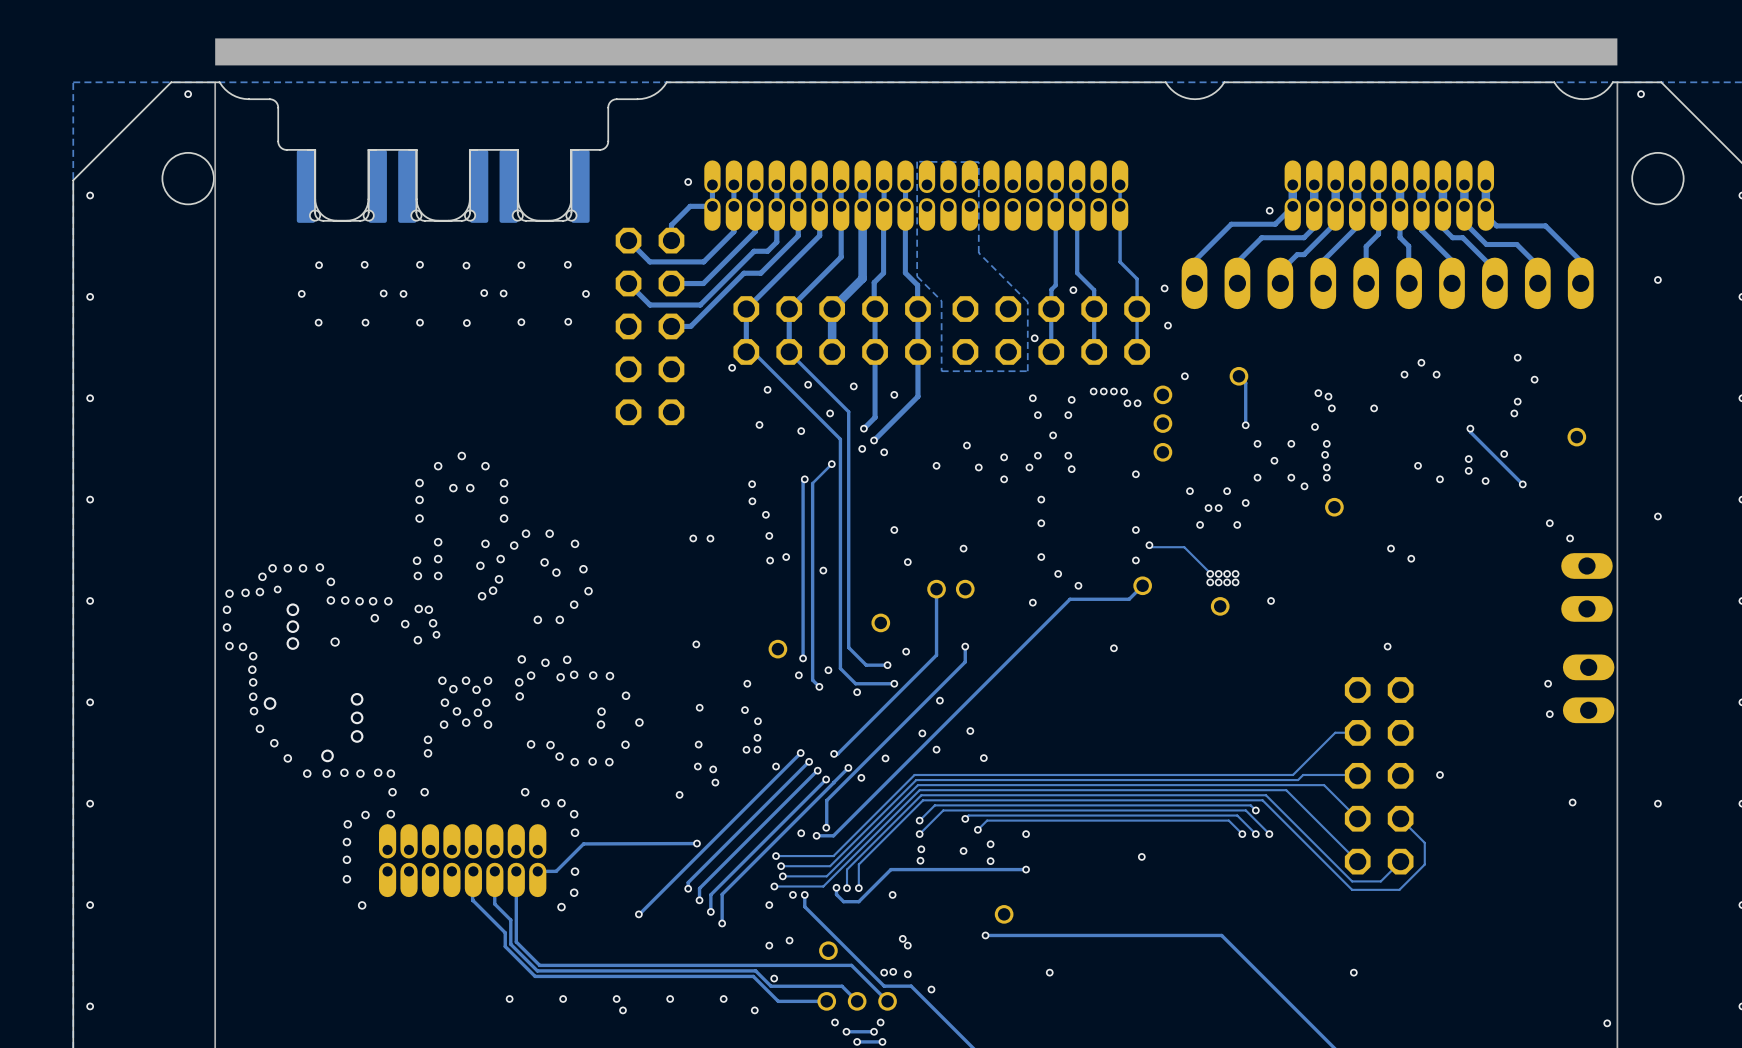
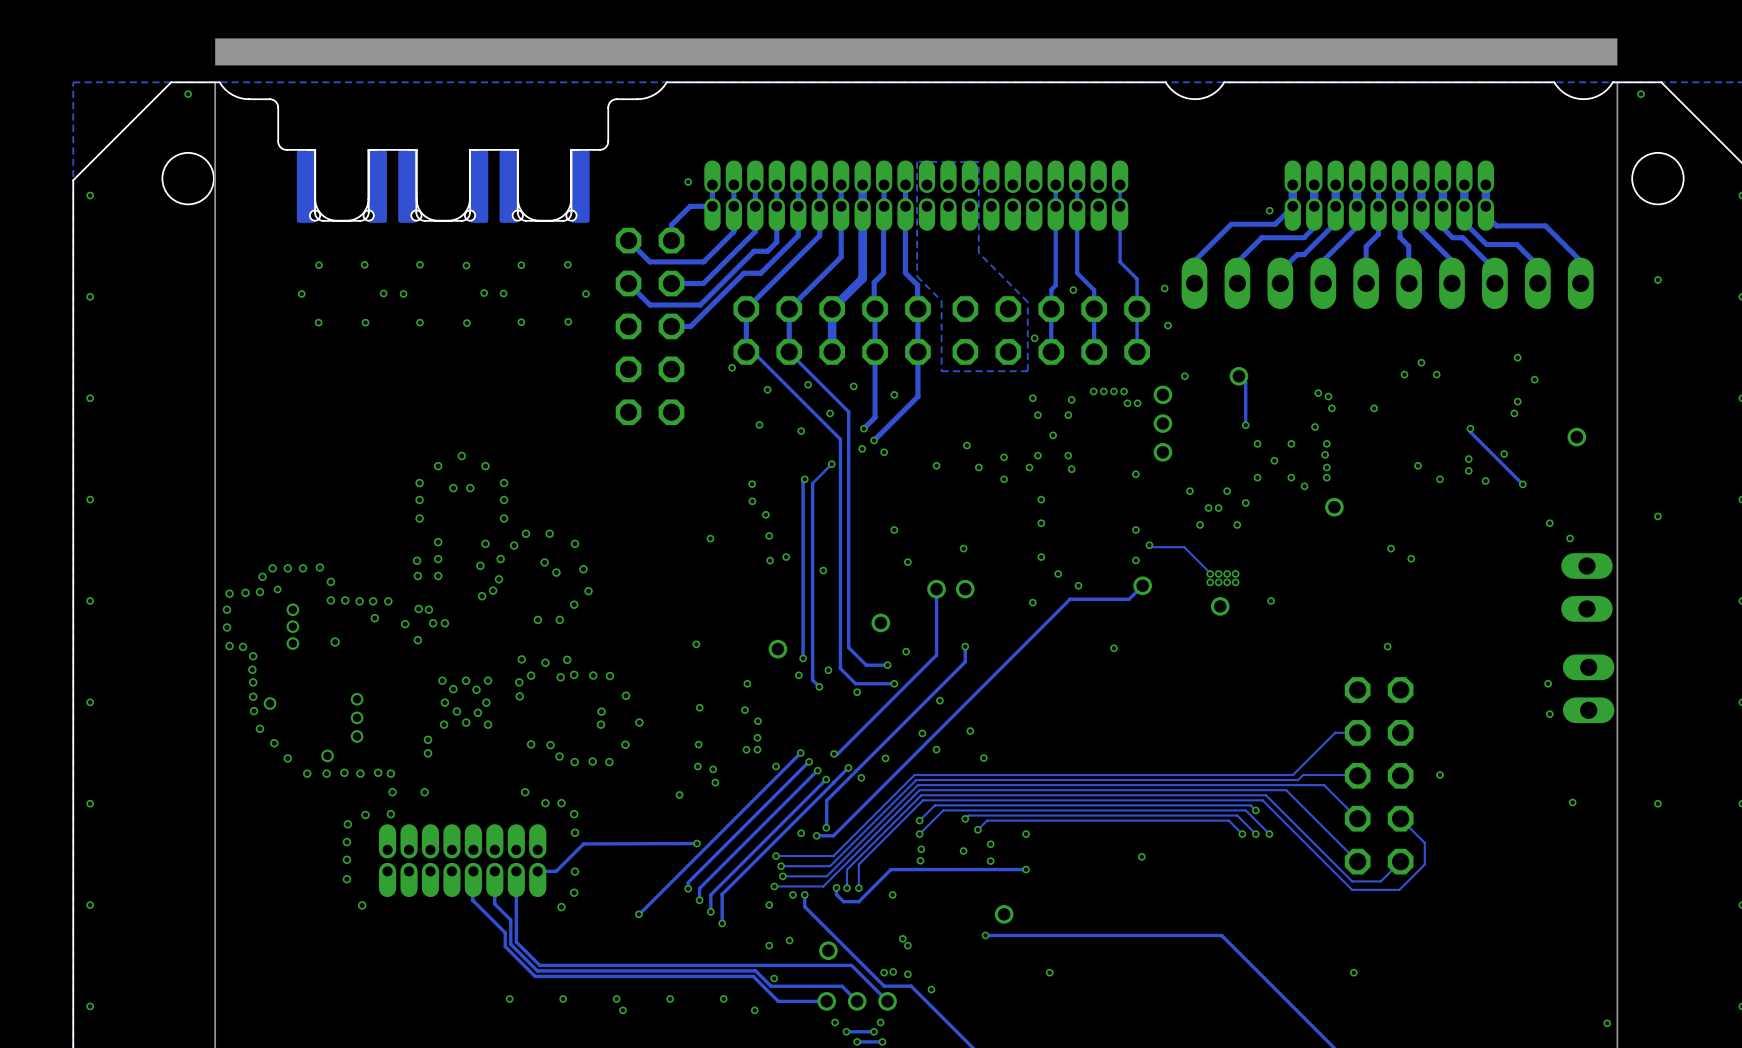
via: (693, 538) -> none
via: none -> (444, 623)
via: (436, 634) -> none

